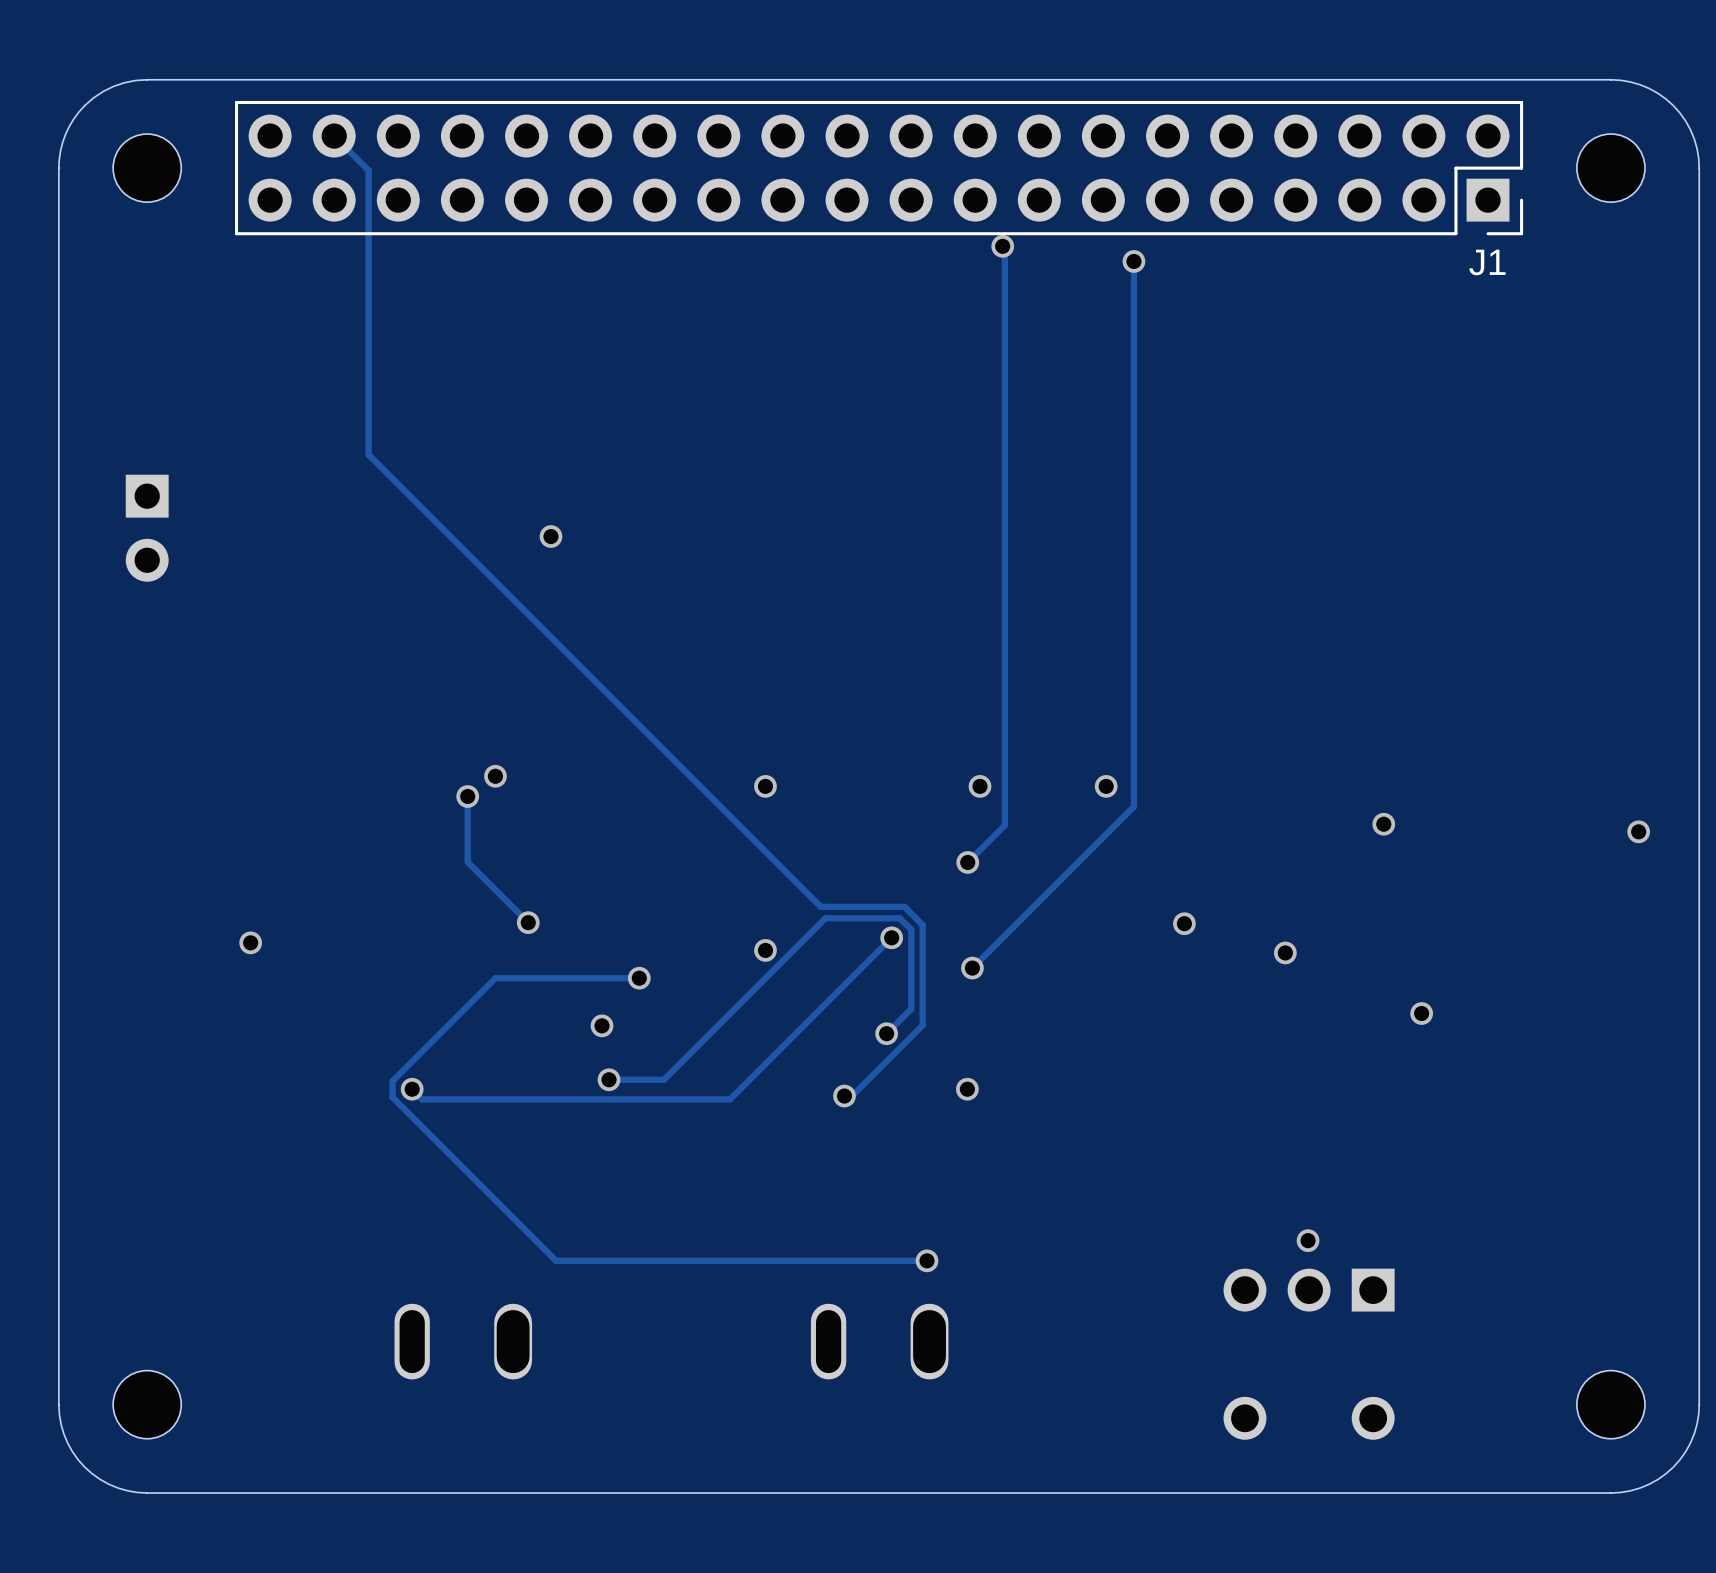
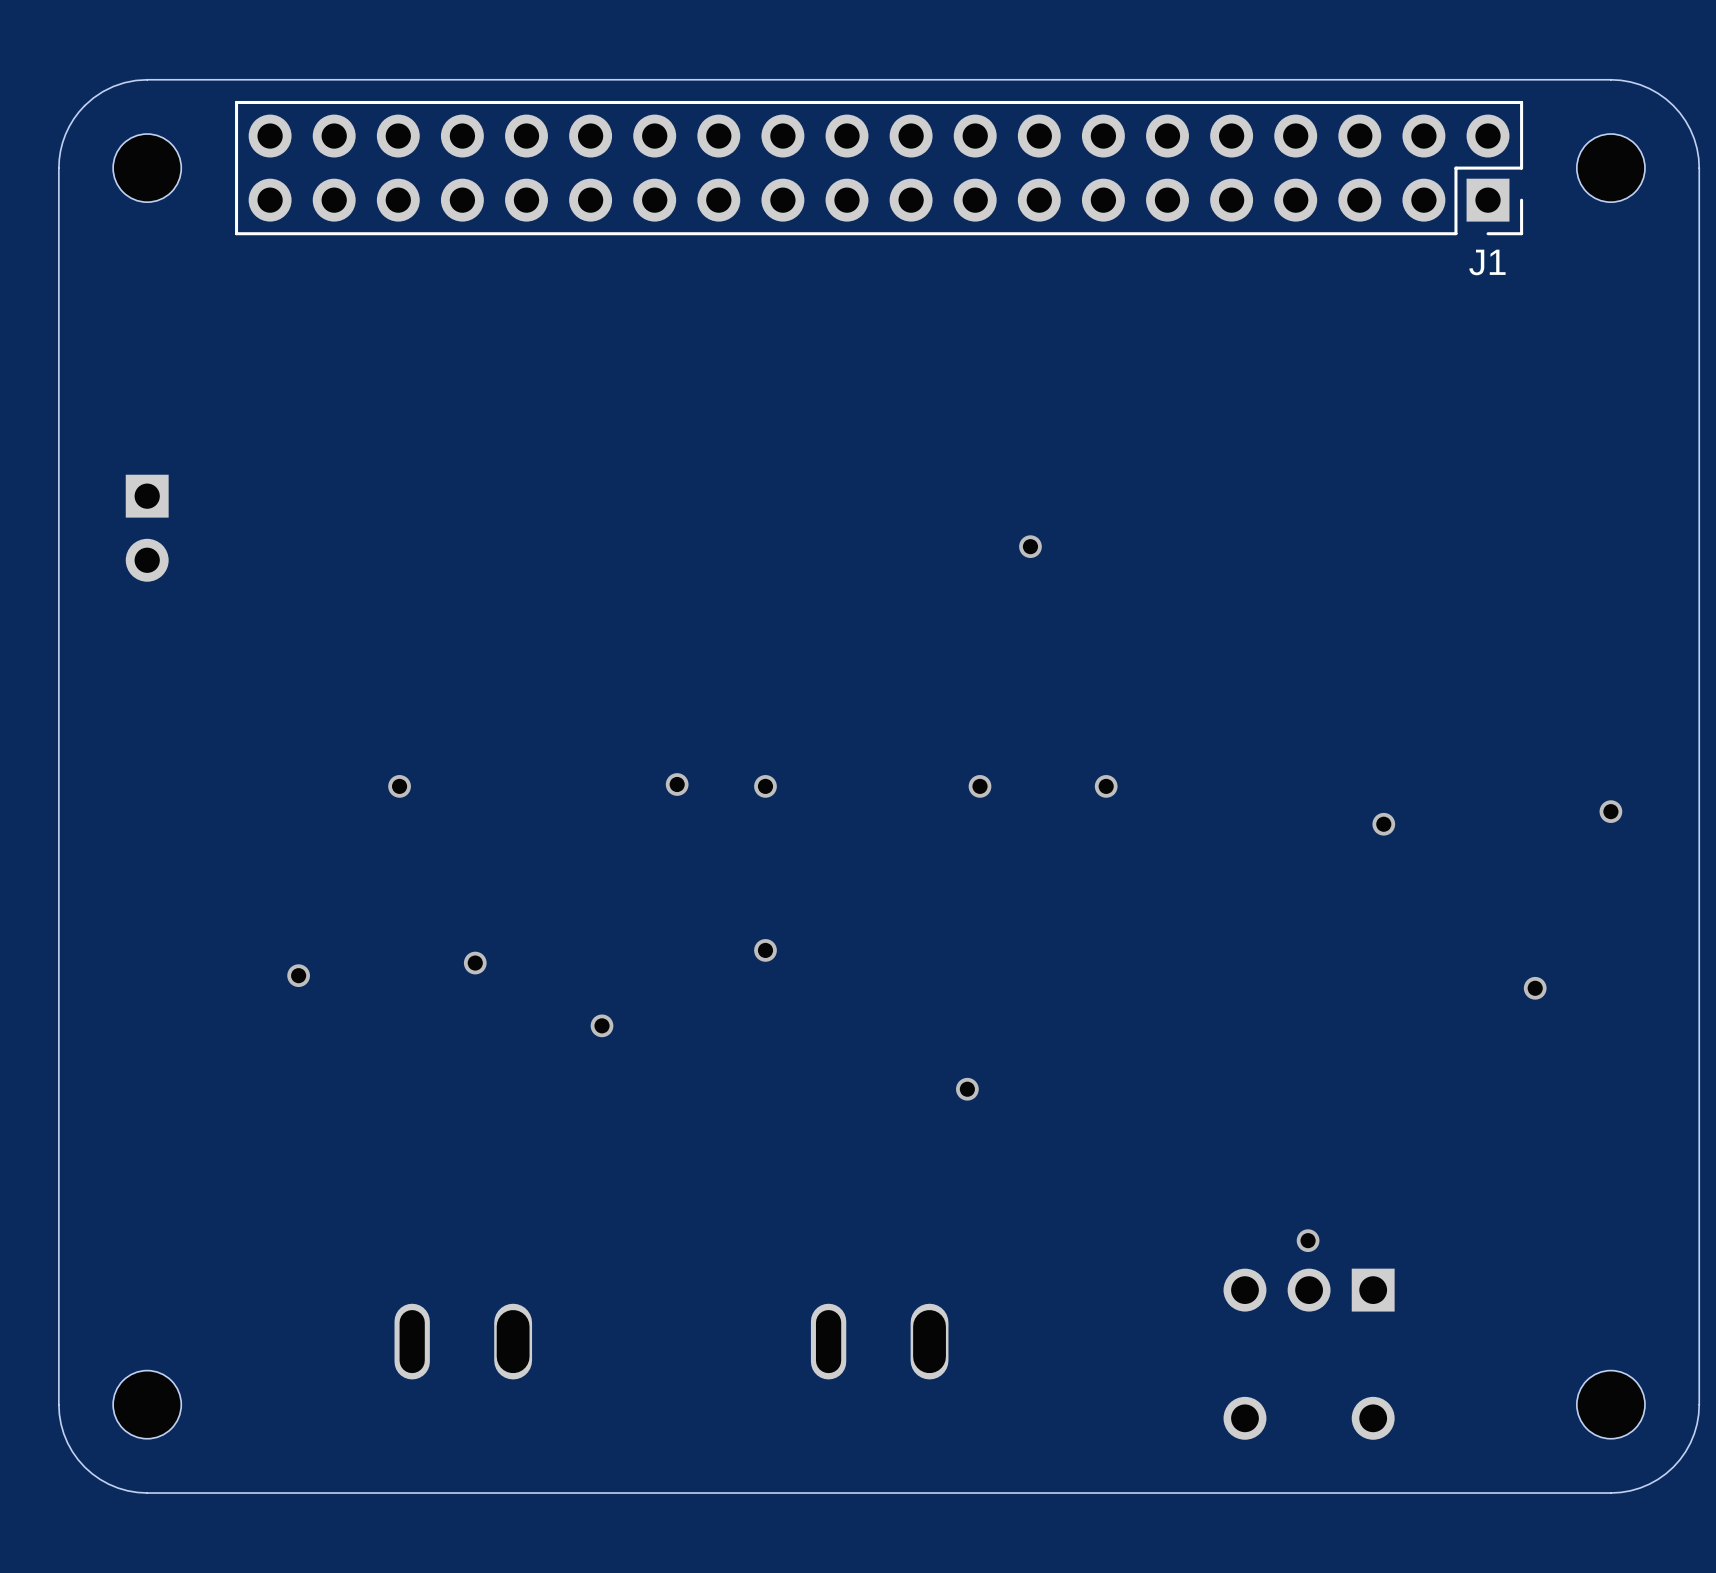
track: (334, 136) (368, 170) (368, 454) (820, 906) (904, 906) (922, 924) (922, 1025) (851, 1096) (844, 1096) -> none
track: (1002, 246) (1004, 248) (1004, 825) (967, 862) -> none
via: (1002, 246) -> none
track: (1133, 261) (1133, 806) (972, 968) -> none
via: (1133, 261) -> none
via: (550, 536) -> none
via: none -> (1030, 546)
via: (495, 776) -> none
via: none -> (677, 784)
via: none -> (399, 786)
track: (467, 796) (467, 862) (528, 922) -> none
via: (467, 796) -> none
via position: (1638, 831) -> (1610, 811)
via: (967, 862) -> none
via position: (528, 922) -> (475, 963)
via: (1184, 923) -> none
track: (891, 937) (730, 1099) (422, 1099) (412, 1089) -> none
via: (891, 937) -> none
via position: (250, 942) -> (298, 975)
via: (1285, 952) -> none
via: (972, 968) -> none
track: (639, 978) (495, 978) (392, 1081) (392, 1097) (556, 1260) (927, 1260) -> none
via: (639, 978) -> none
via: none -> (1535, 988)
via: (1421, 1013) -> none
track: (886, 1033) (911, 1009) (911, 929) (899, 918) (825, 918) (663, 1079) (609, 1079) -> none
via: (886, 1033) -> none
via: (609, 1079) -> none
via: (412, 1089) -> none
via: (844, 1096) -> none
via: (927, 1260) -> none

